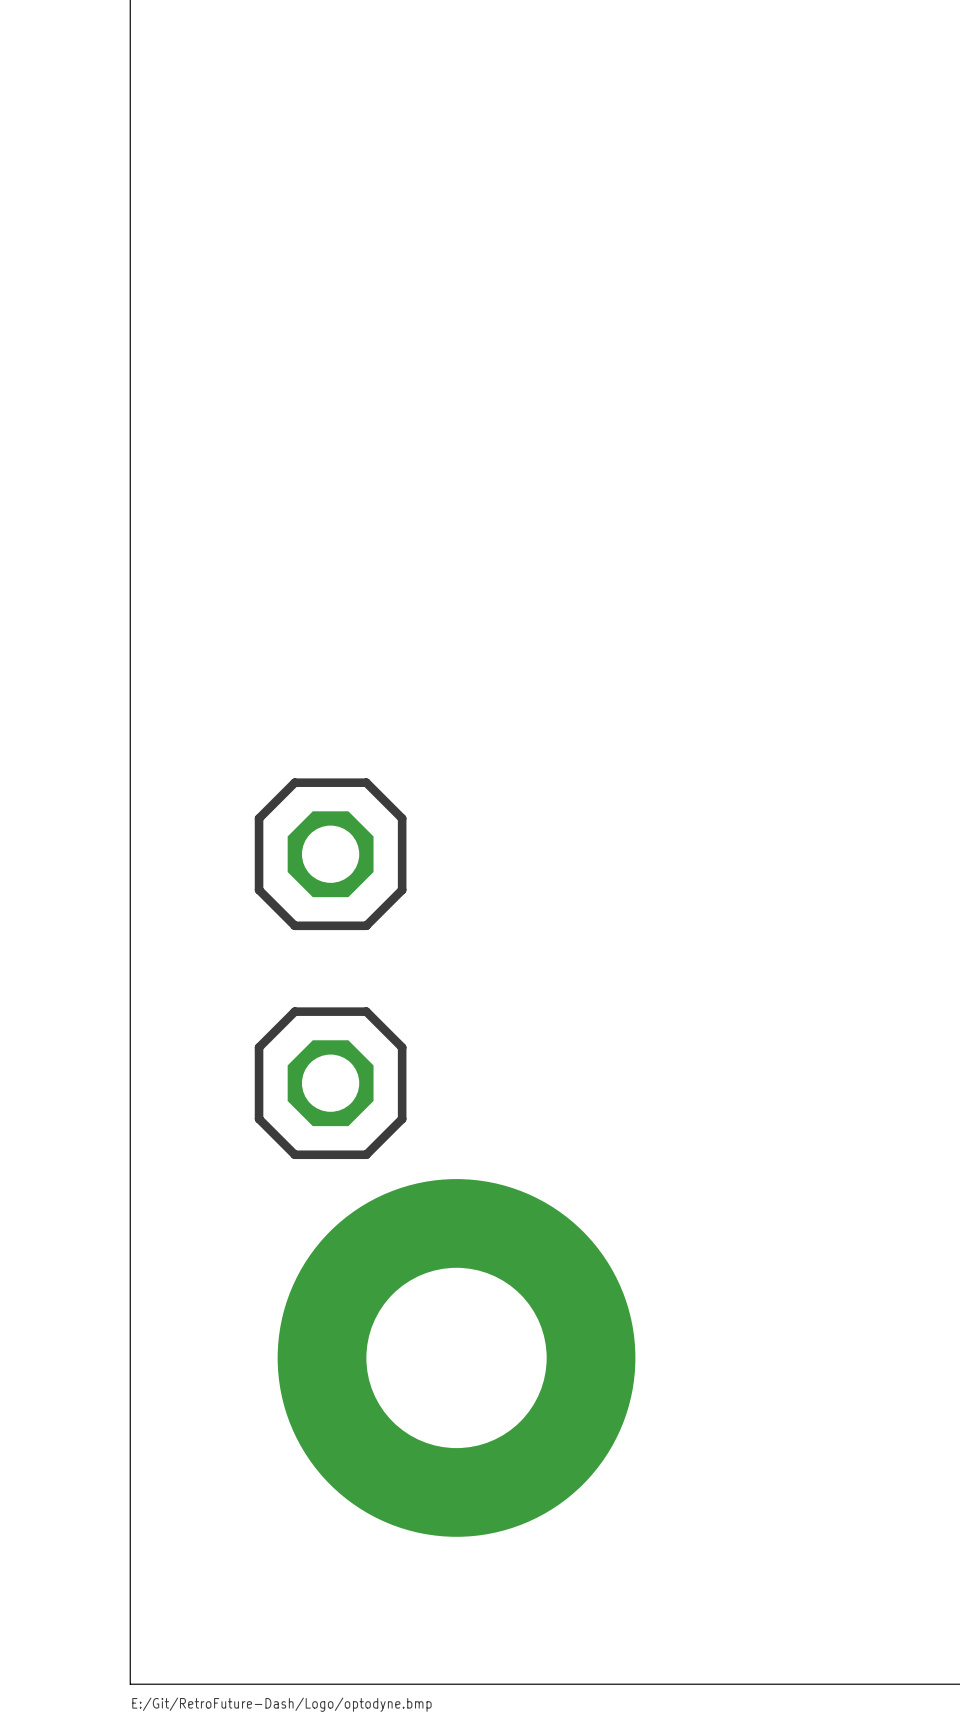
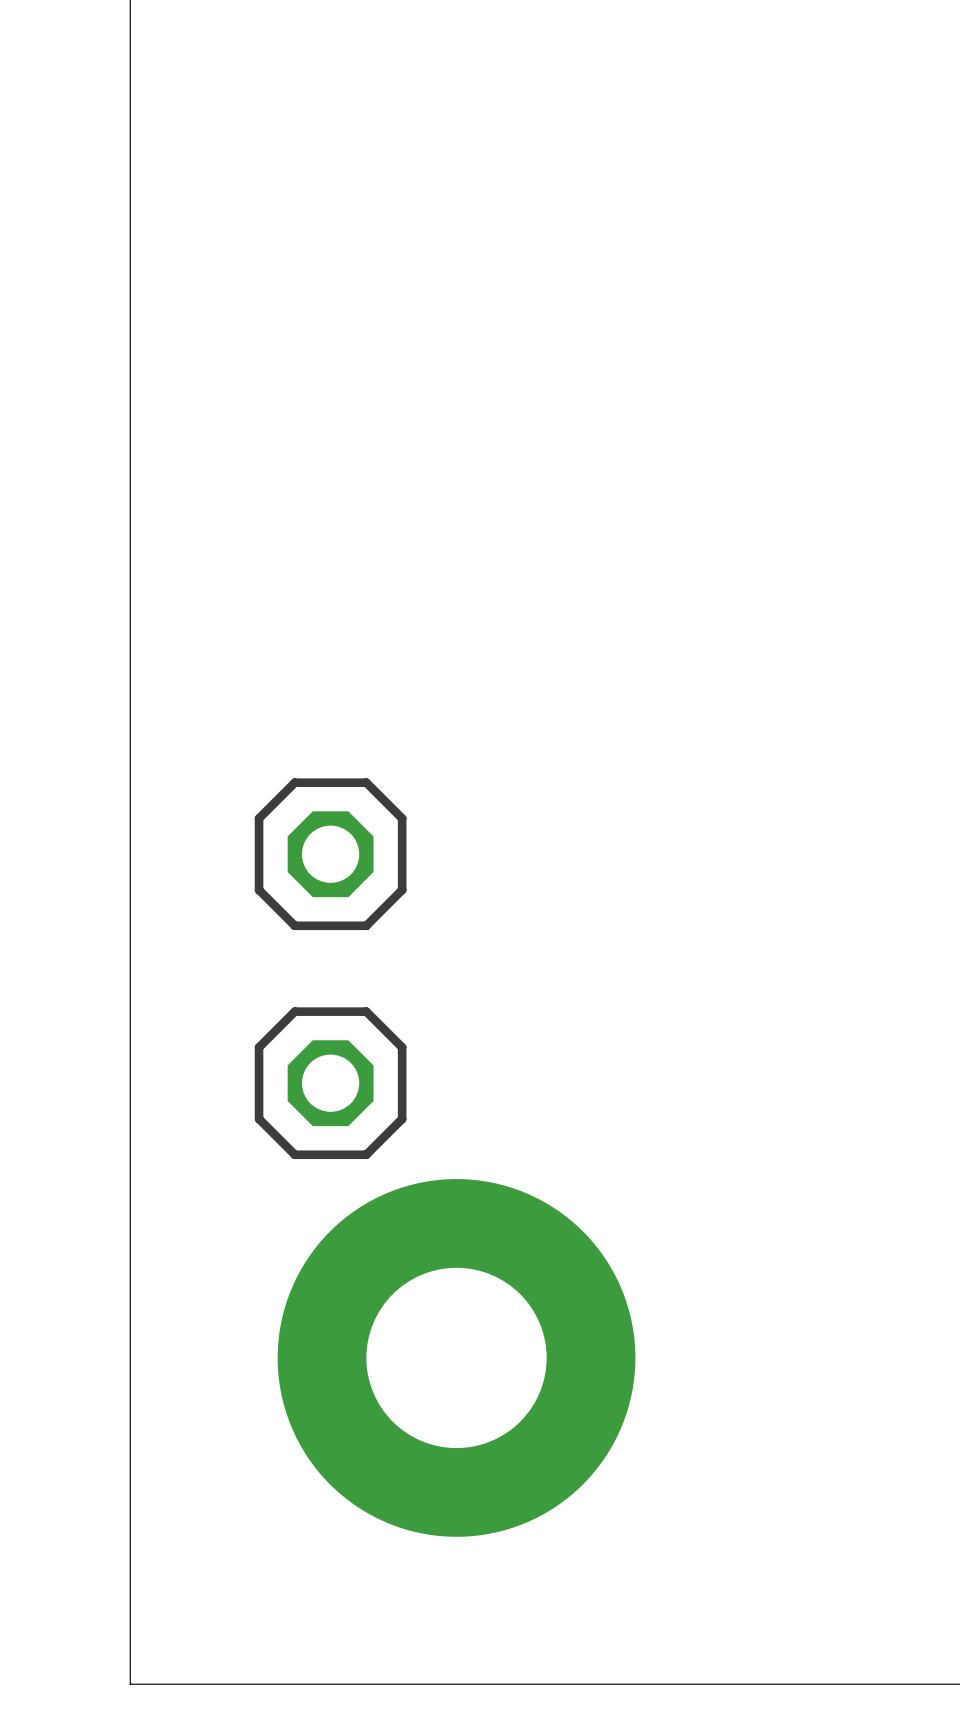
text: E:/Git/RetroFuture-Dash/Logo/optodyne.bmp (281, 1704) -> none

